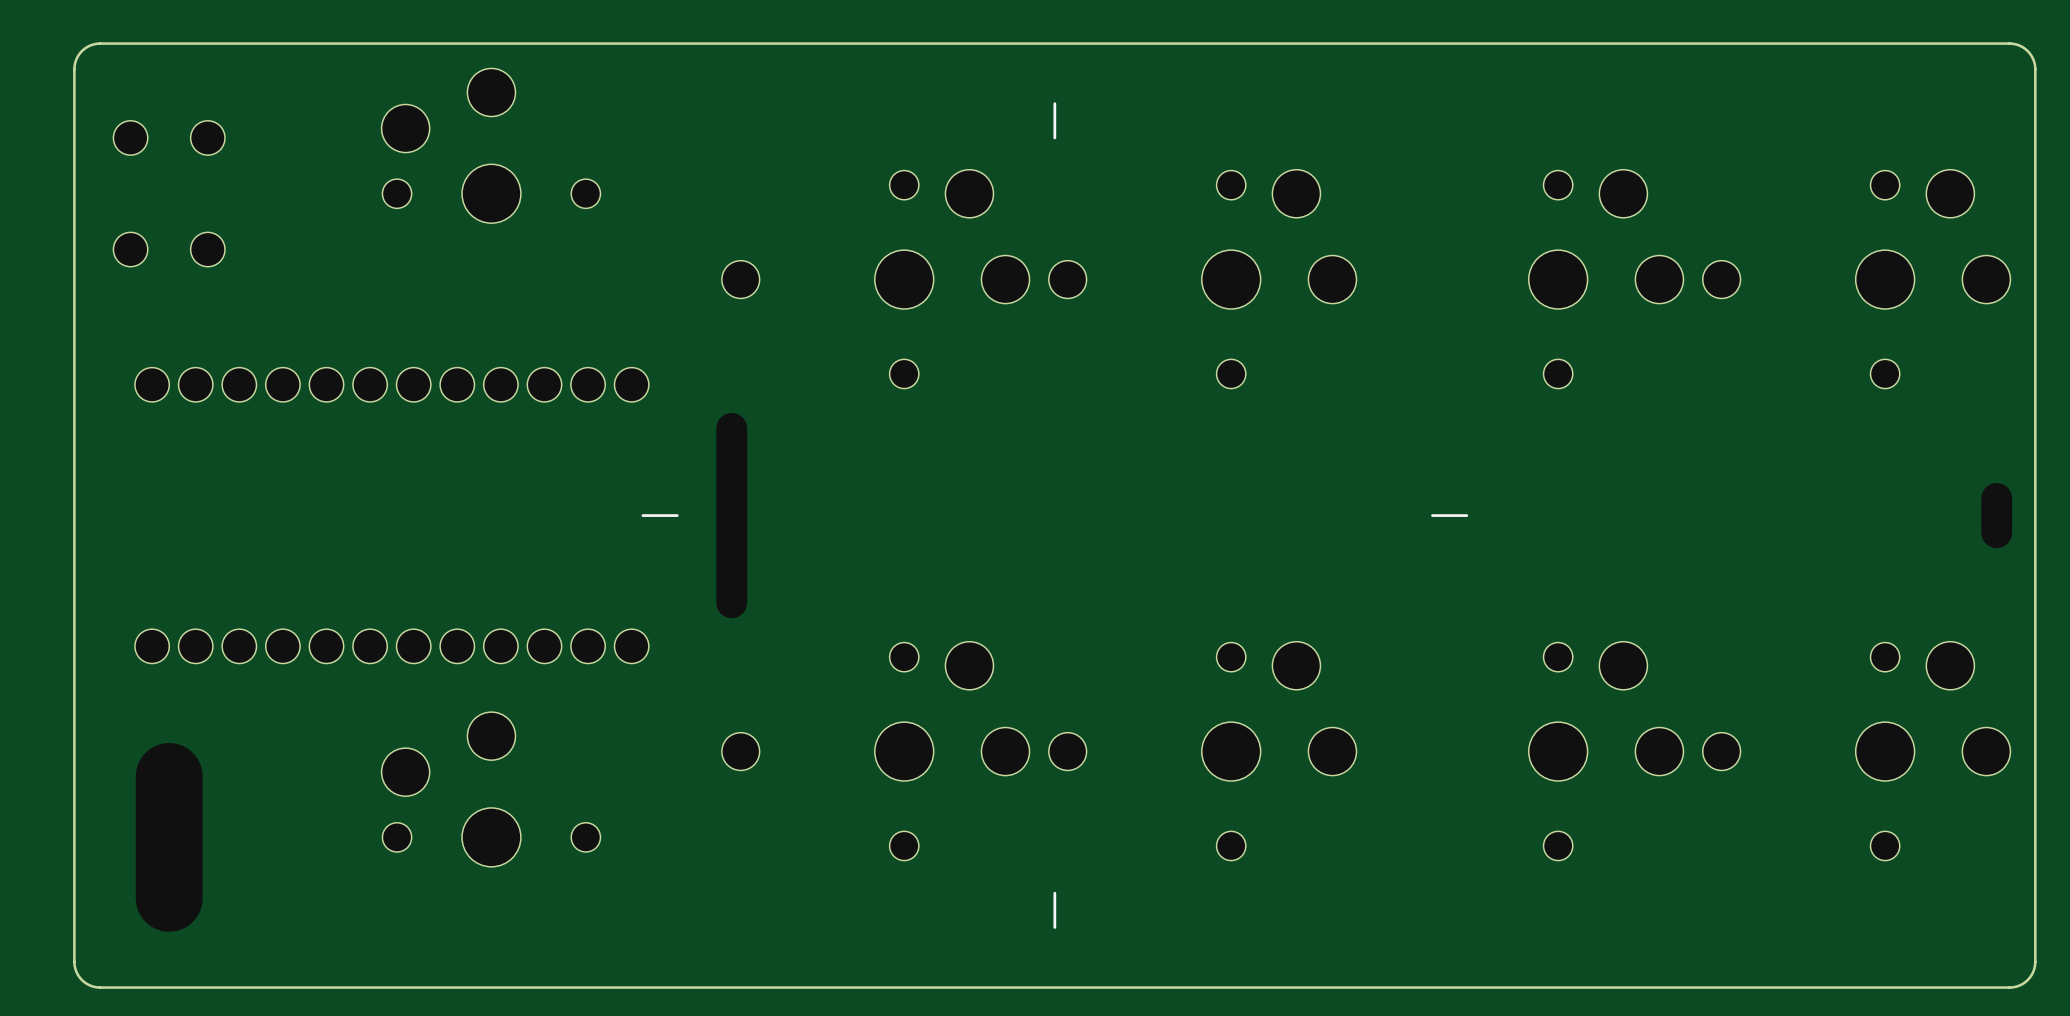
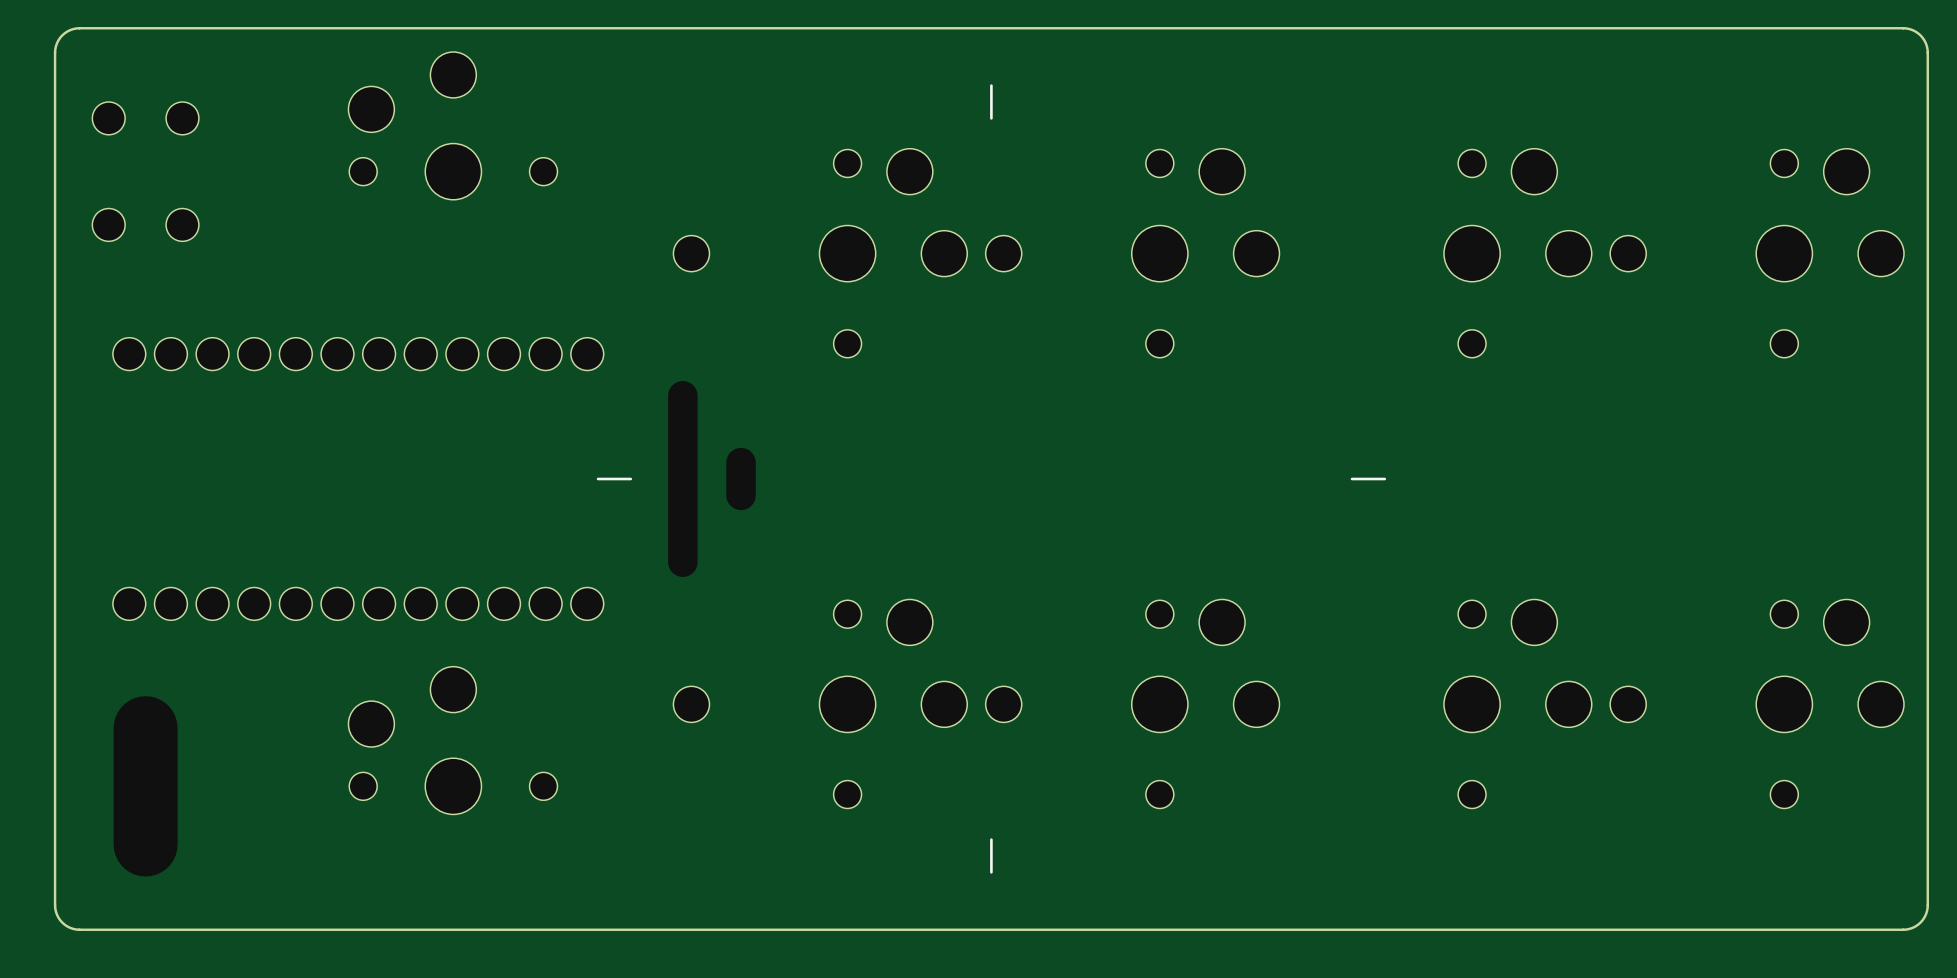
part: none -> (741, 479)
part: (1996, 515) -> none

